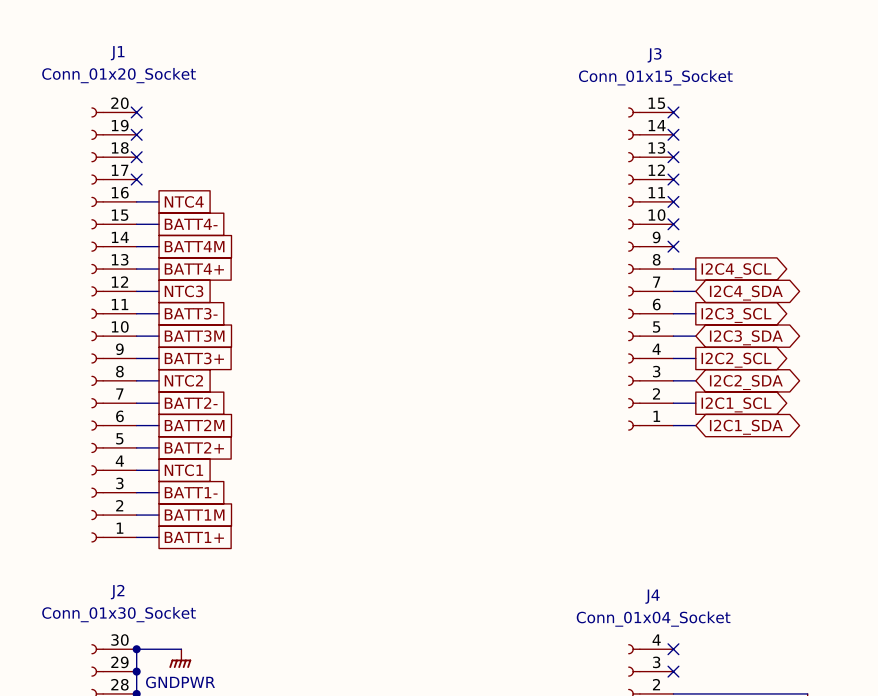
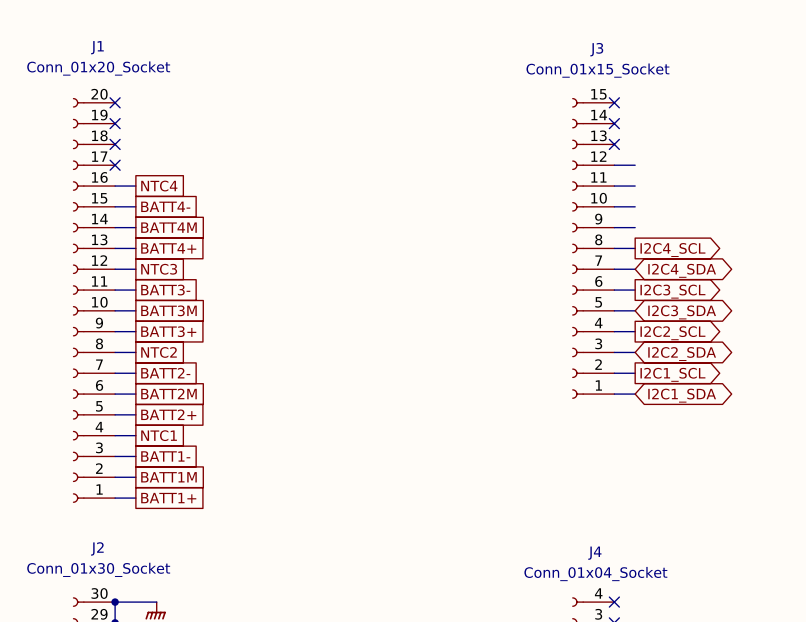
wire: none -> (614, 165) (635, 165)
no-connect mark: (673, 179) -> none
wire: none -> (614, 186) (635, 186)
no-connect mark: (673, 201) -> none
wire: none -> (614, 206) (635, 206)
no-connect mark: (673, 224) -> none
wire: none -> (614, 227) (635, 227)
no-connect mark: (673, 246) -> none

